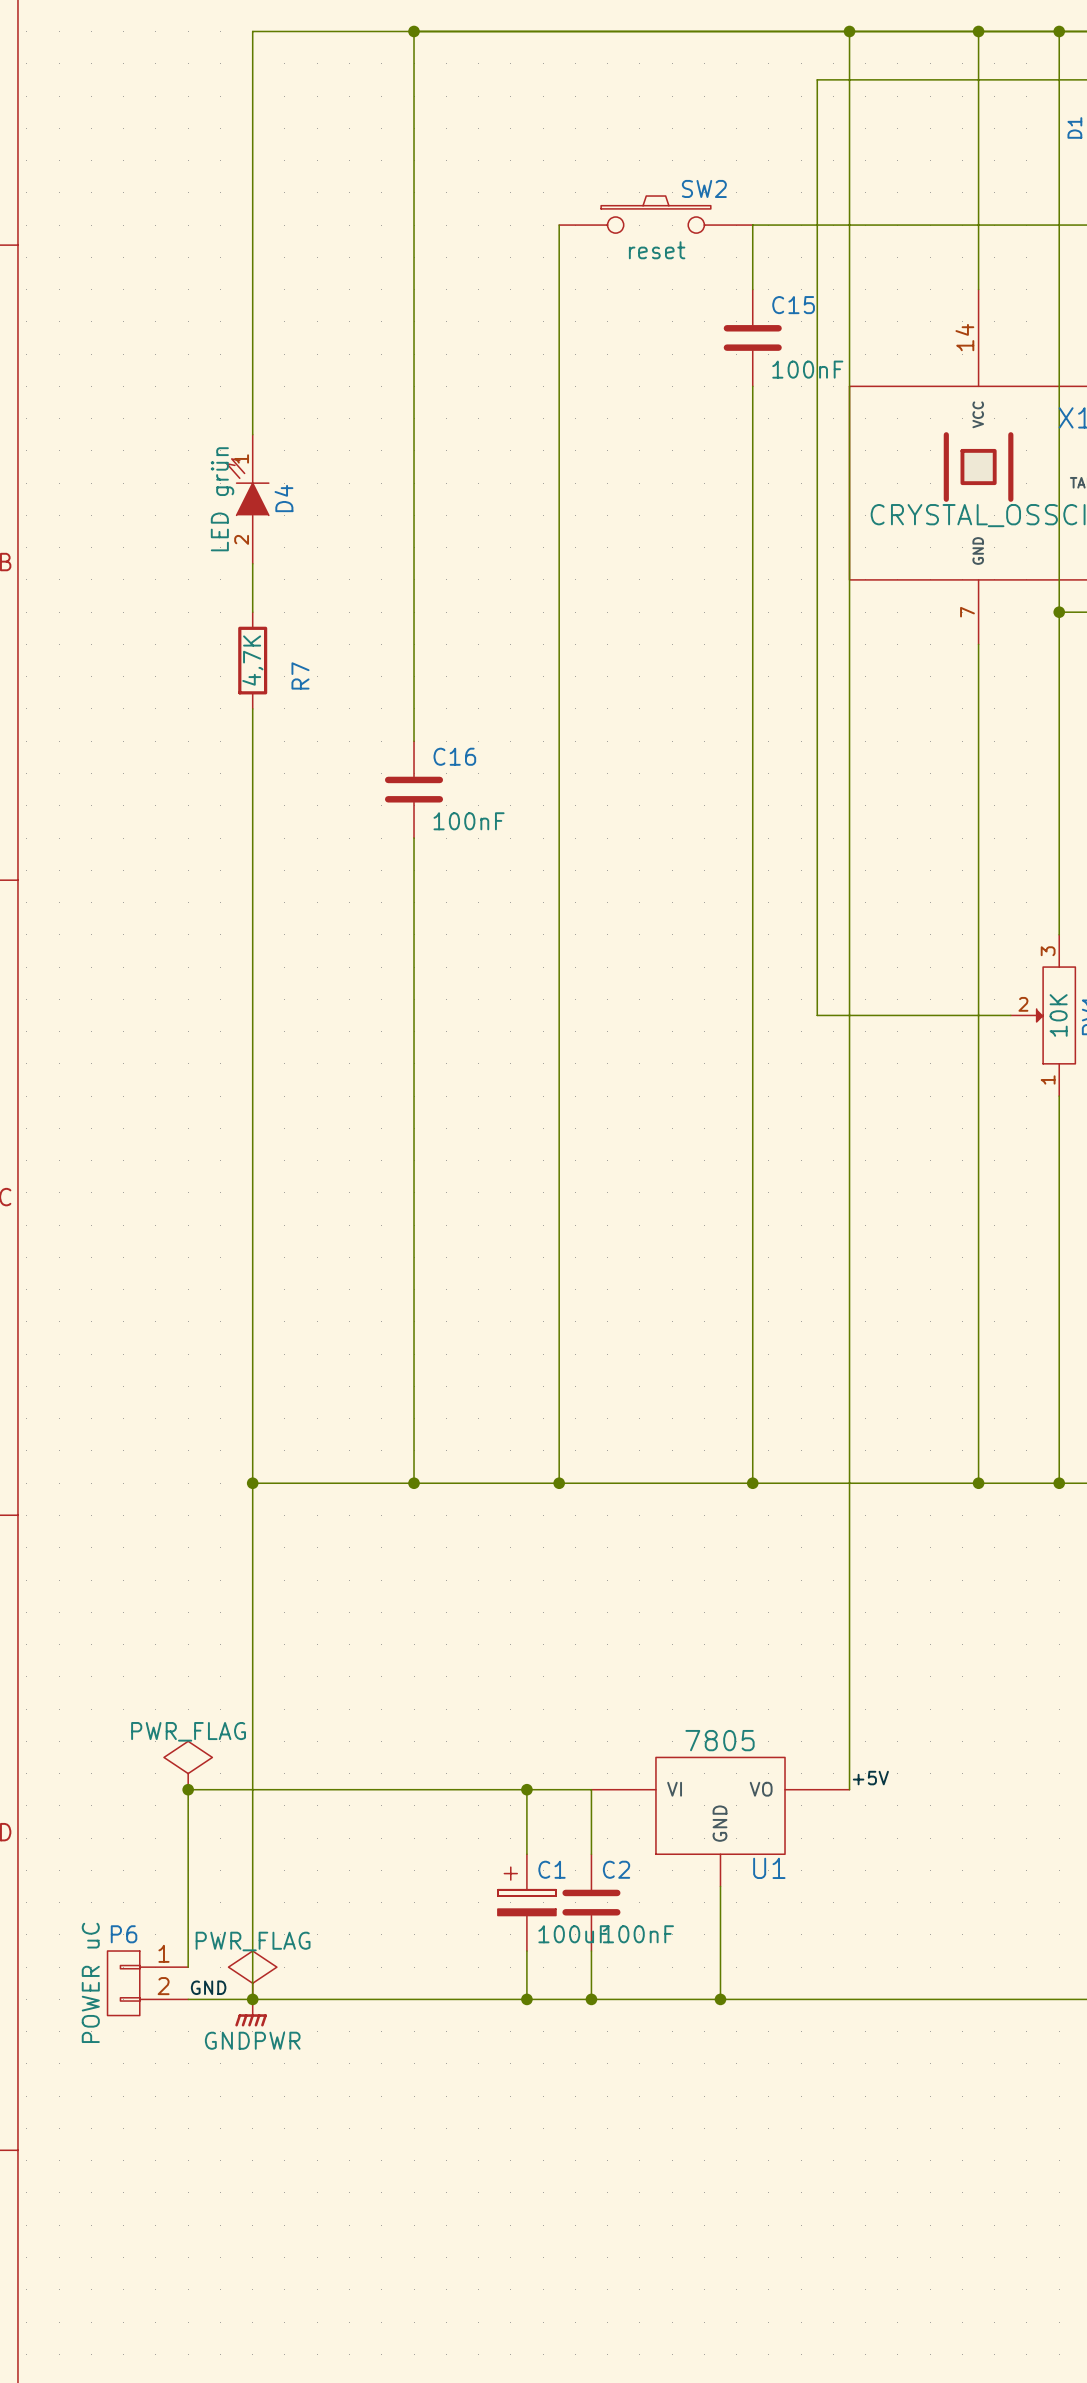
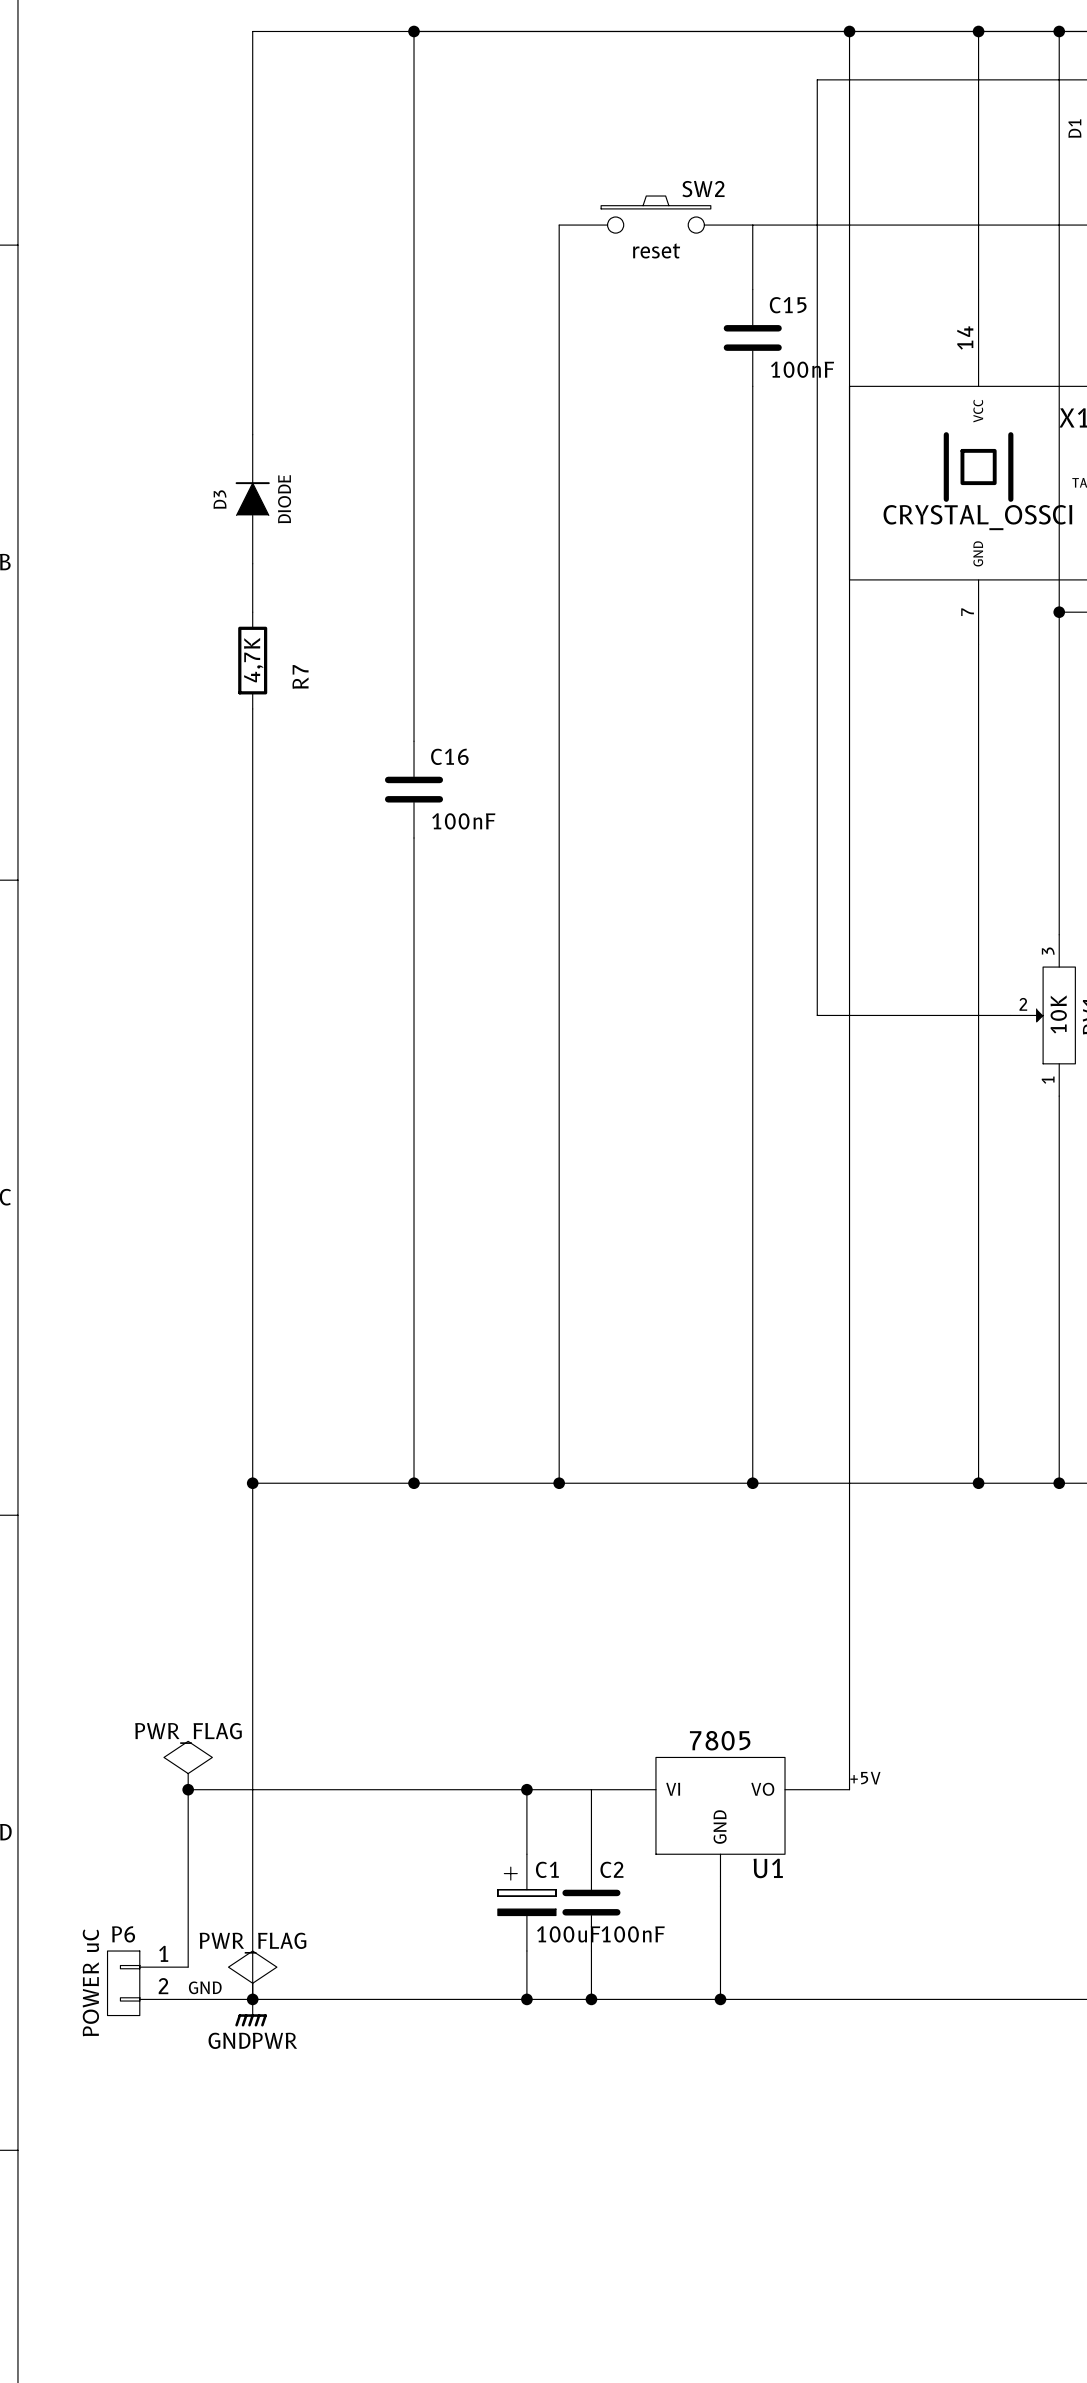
D4: LED grün (247, 499) -> none
D3: none -> DIODE (252, 499)

